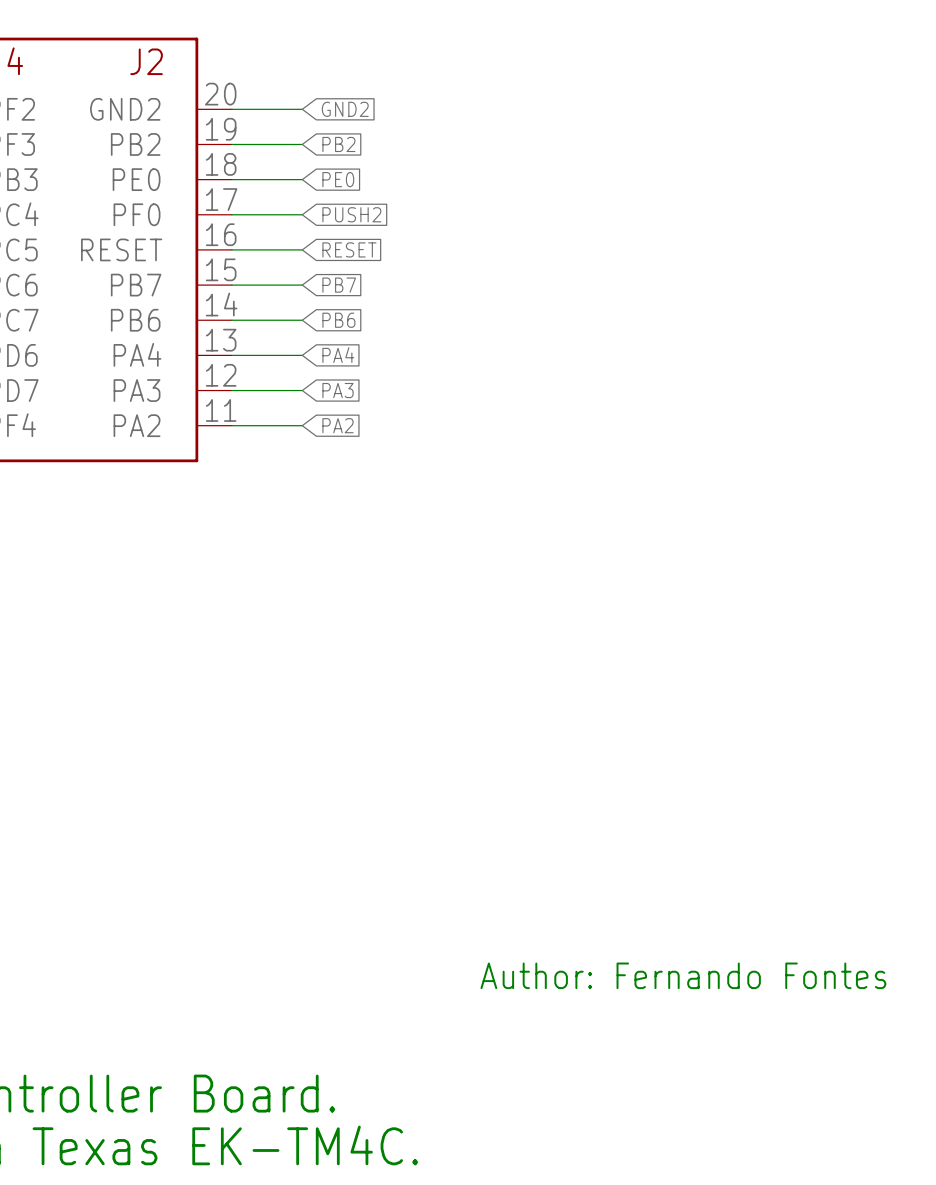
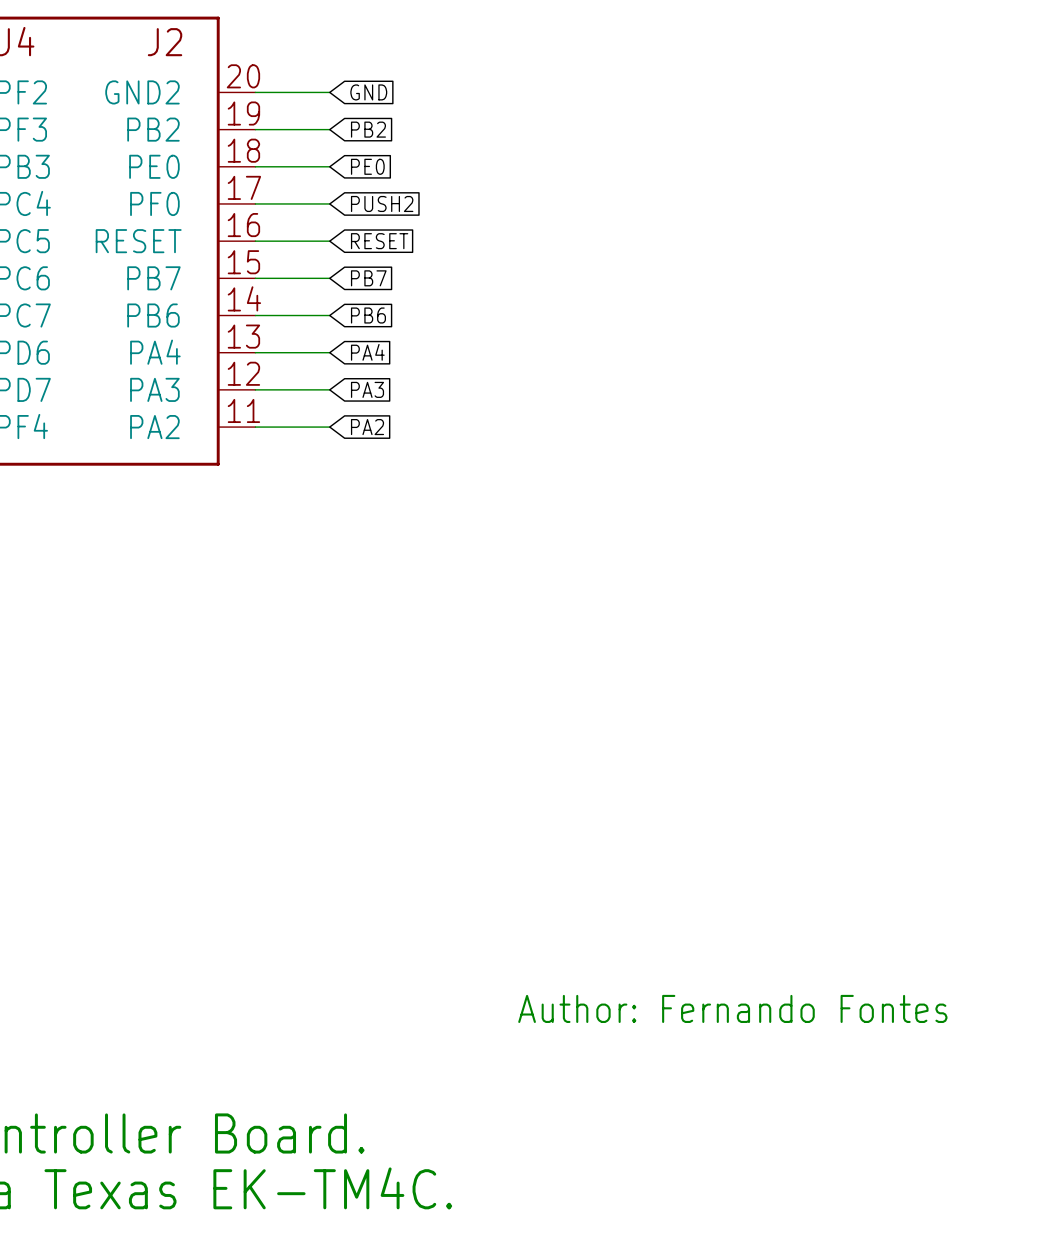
global label: GND2 (345, 109) -> GND (368, 92)

